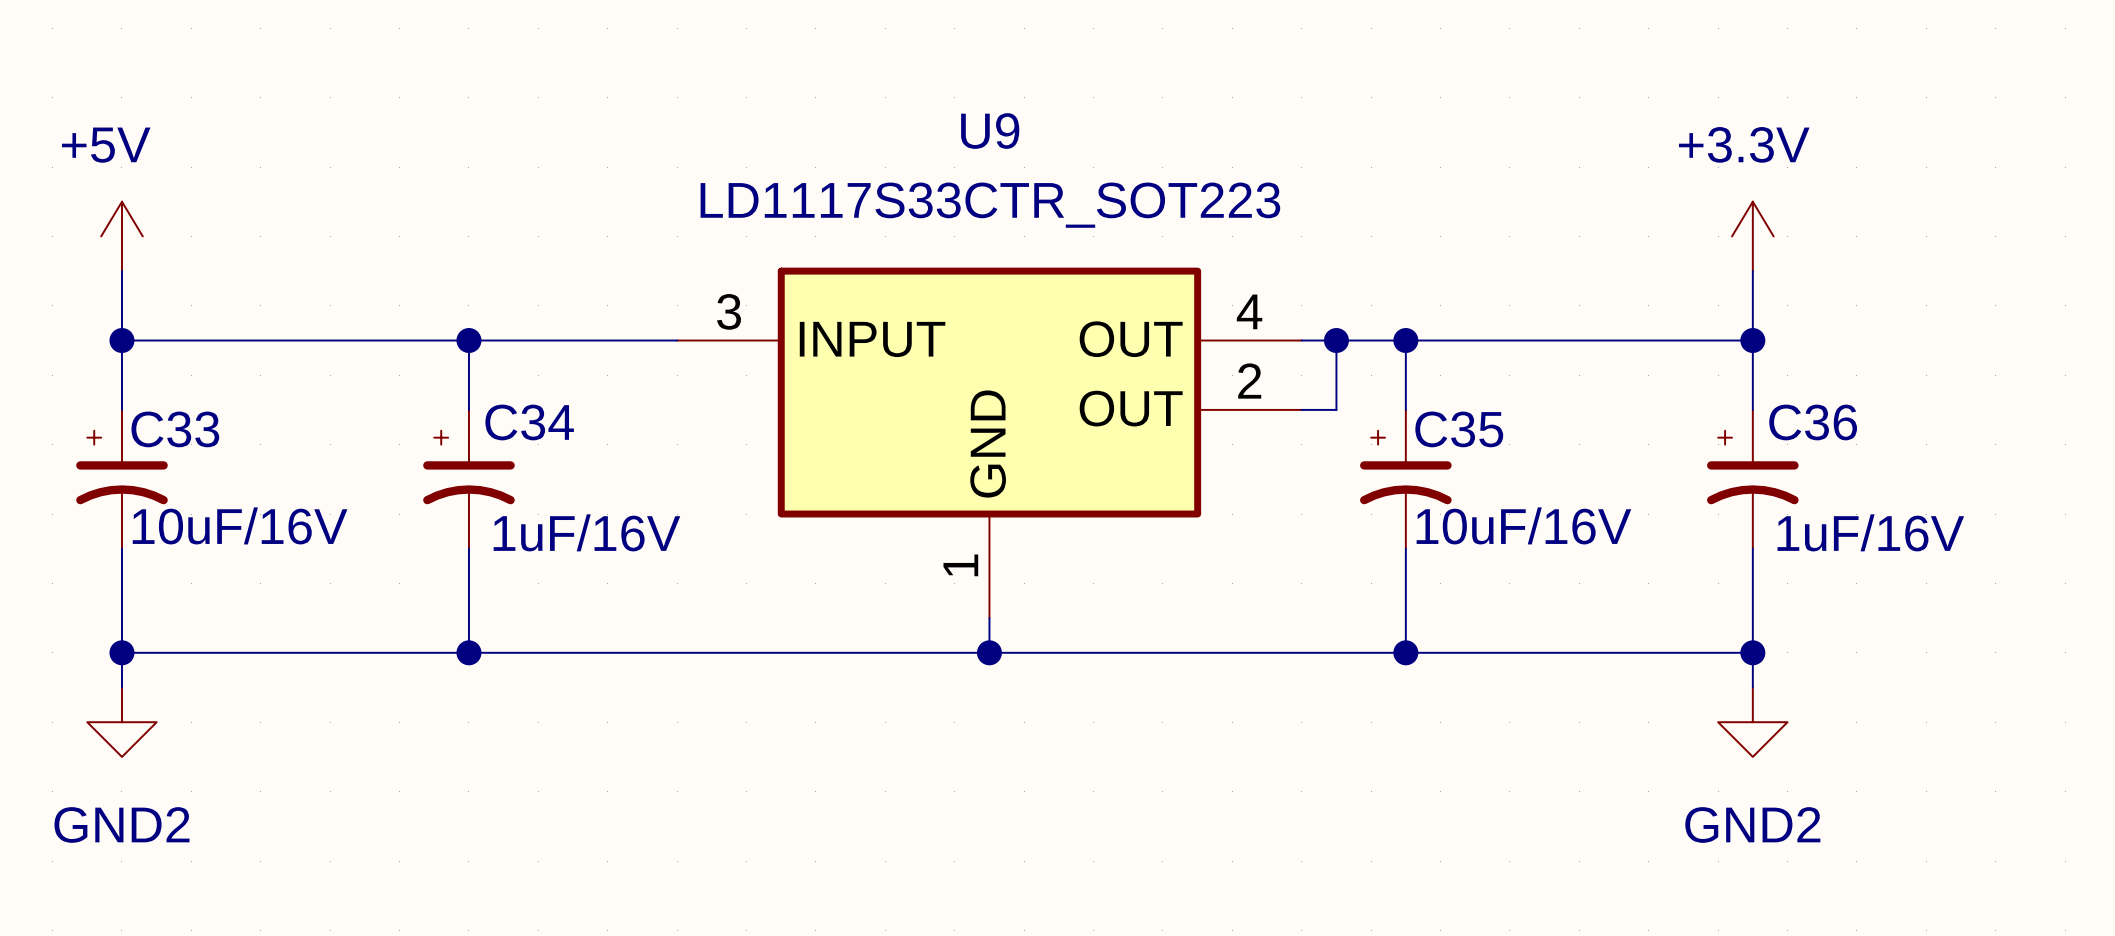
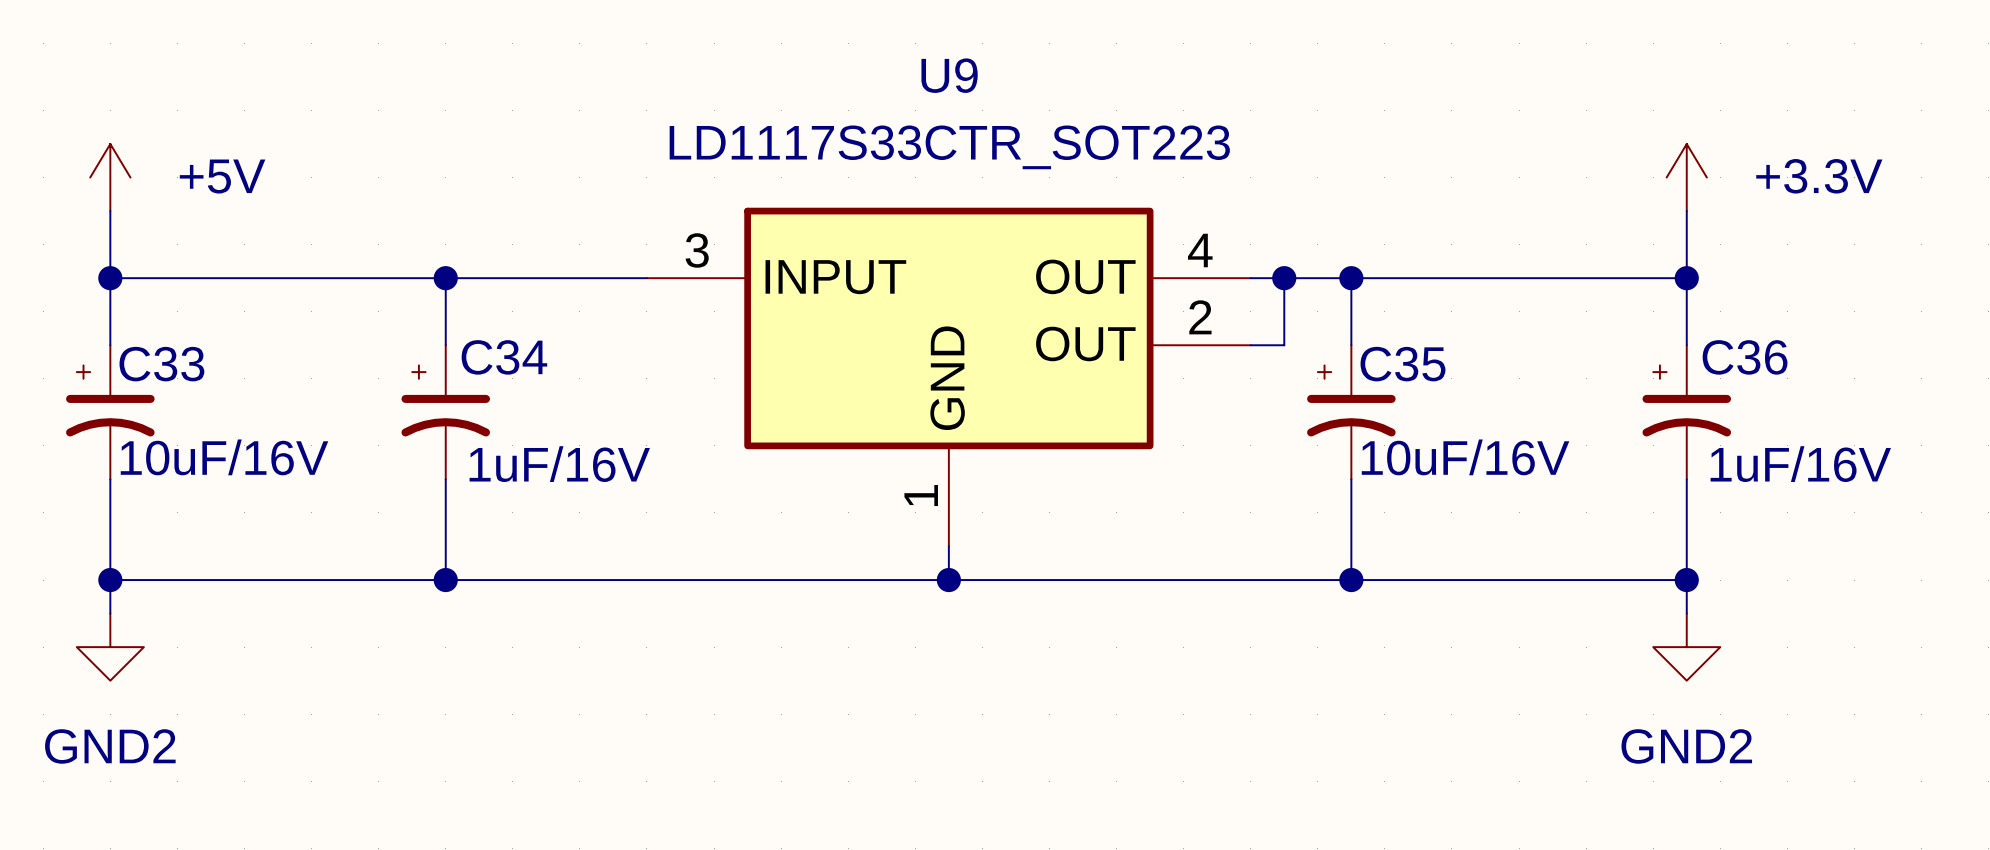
power symbol text position: +3.3V (1744, 144) -> +3.3V (1819, 176)
power symbol text position: +5V (106, 145) -> +5V (222, 176)

